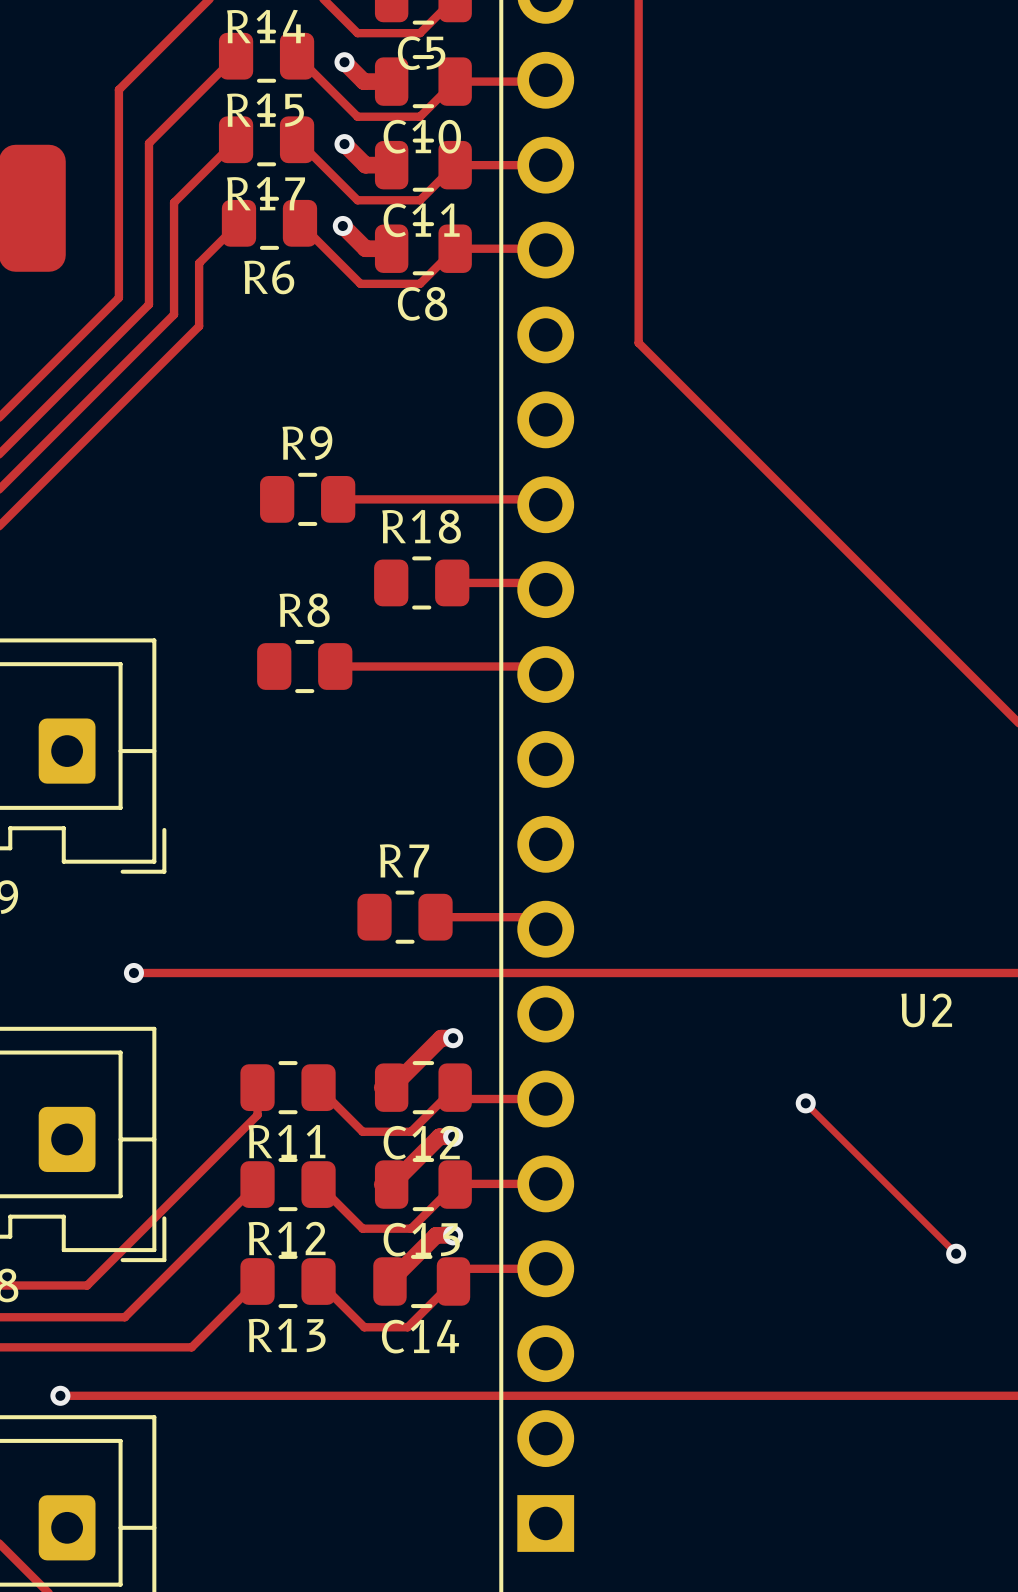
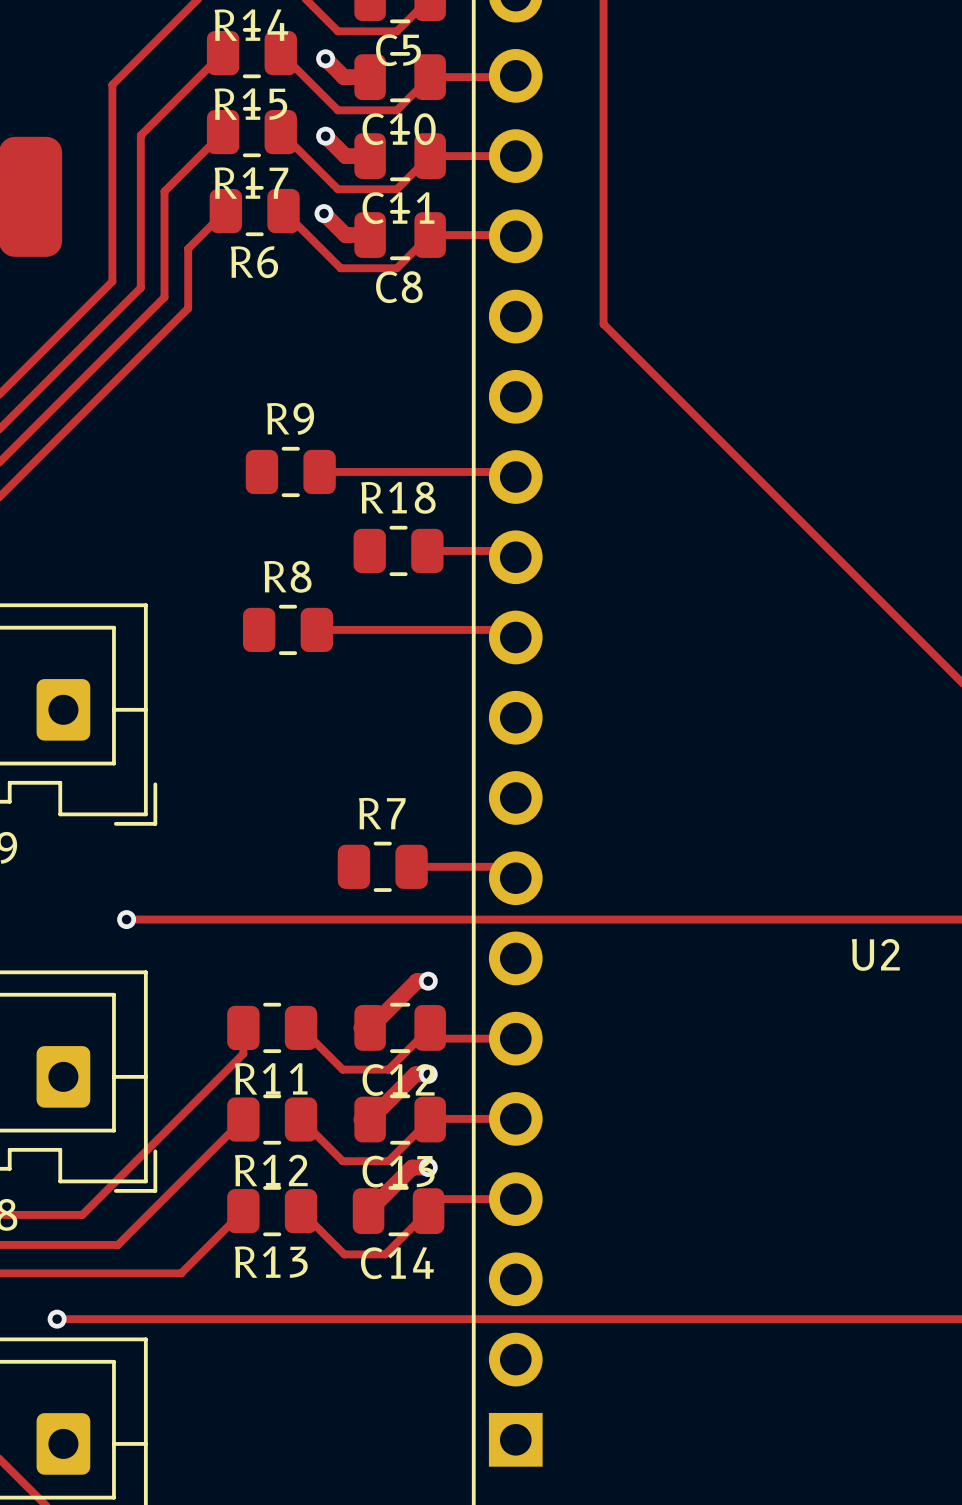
track: (805, 1103) (956, 1253) -> none
via: (805, 1103) -> none
via: (956, 1253) -> none

